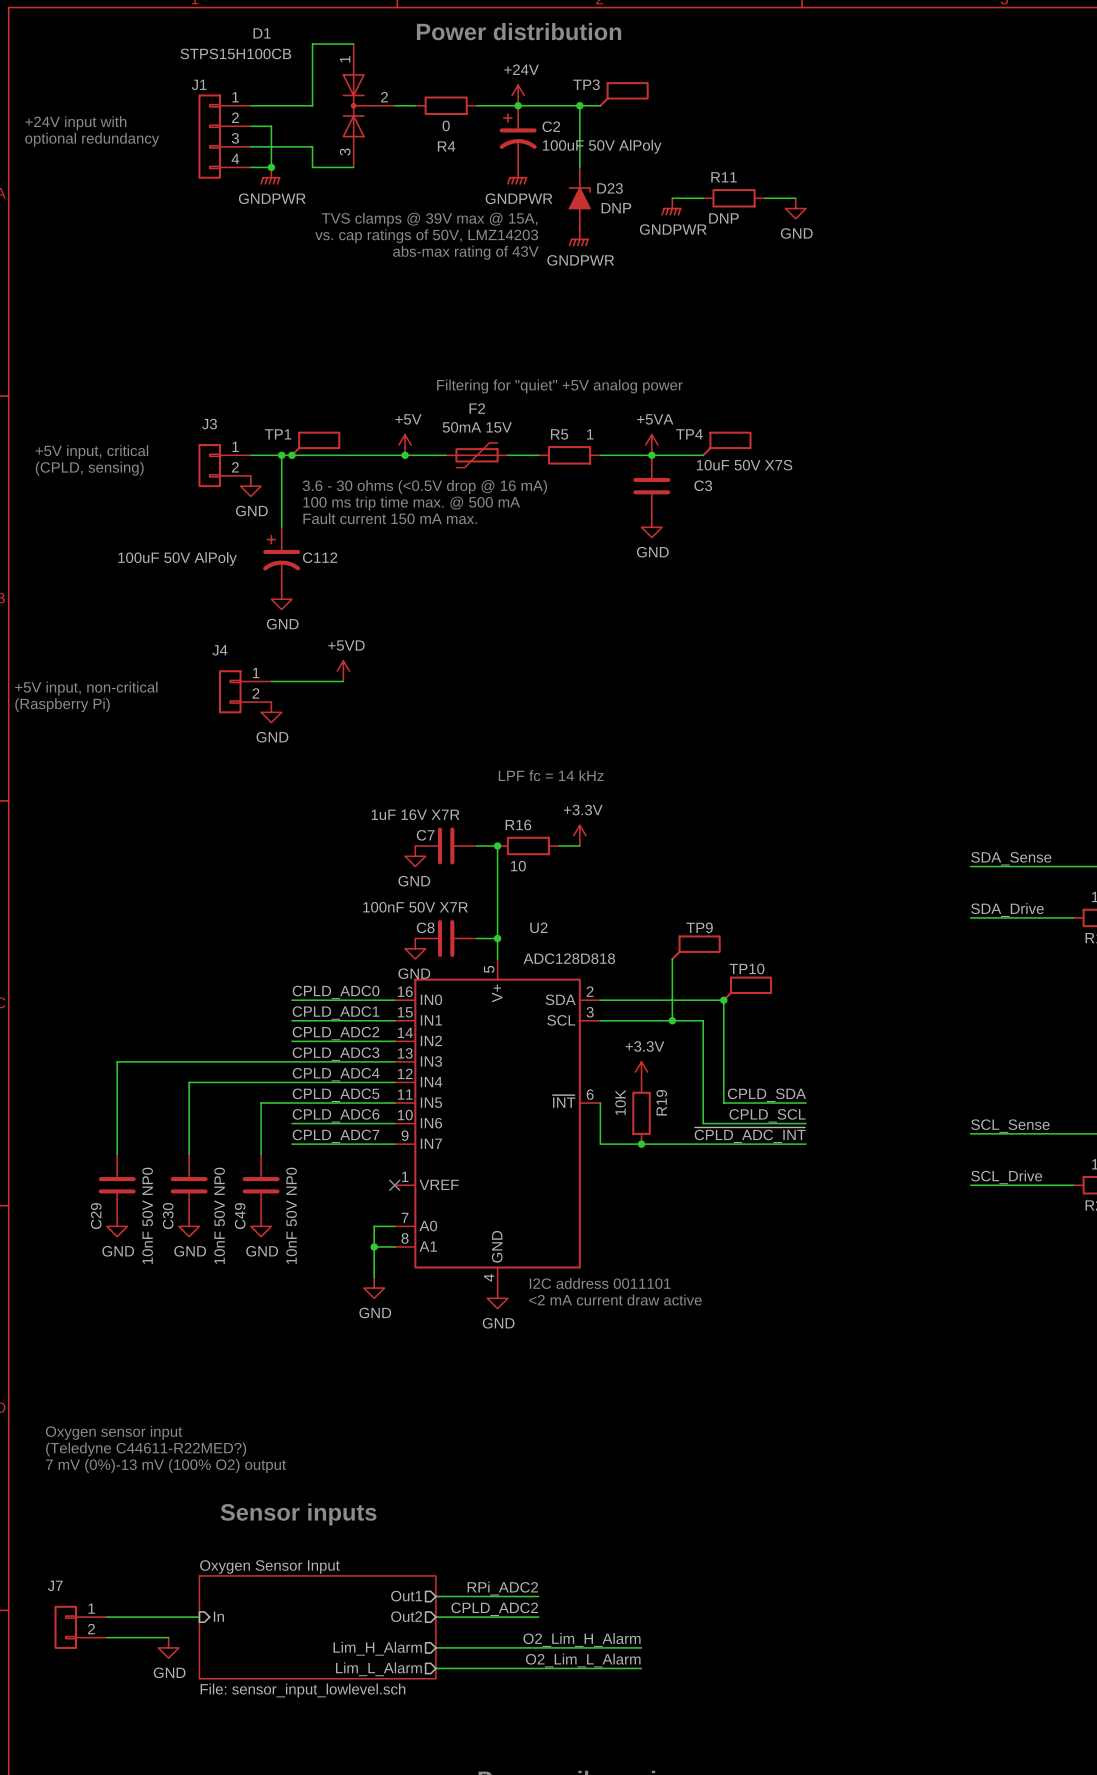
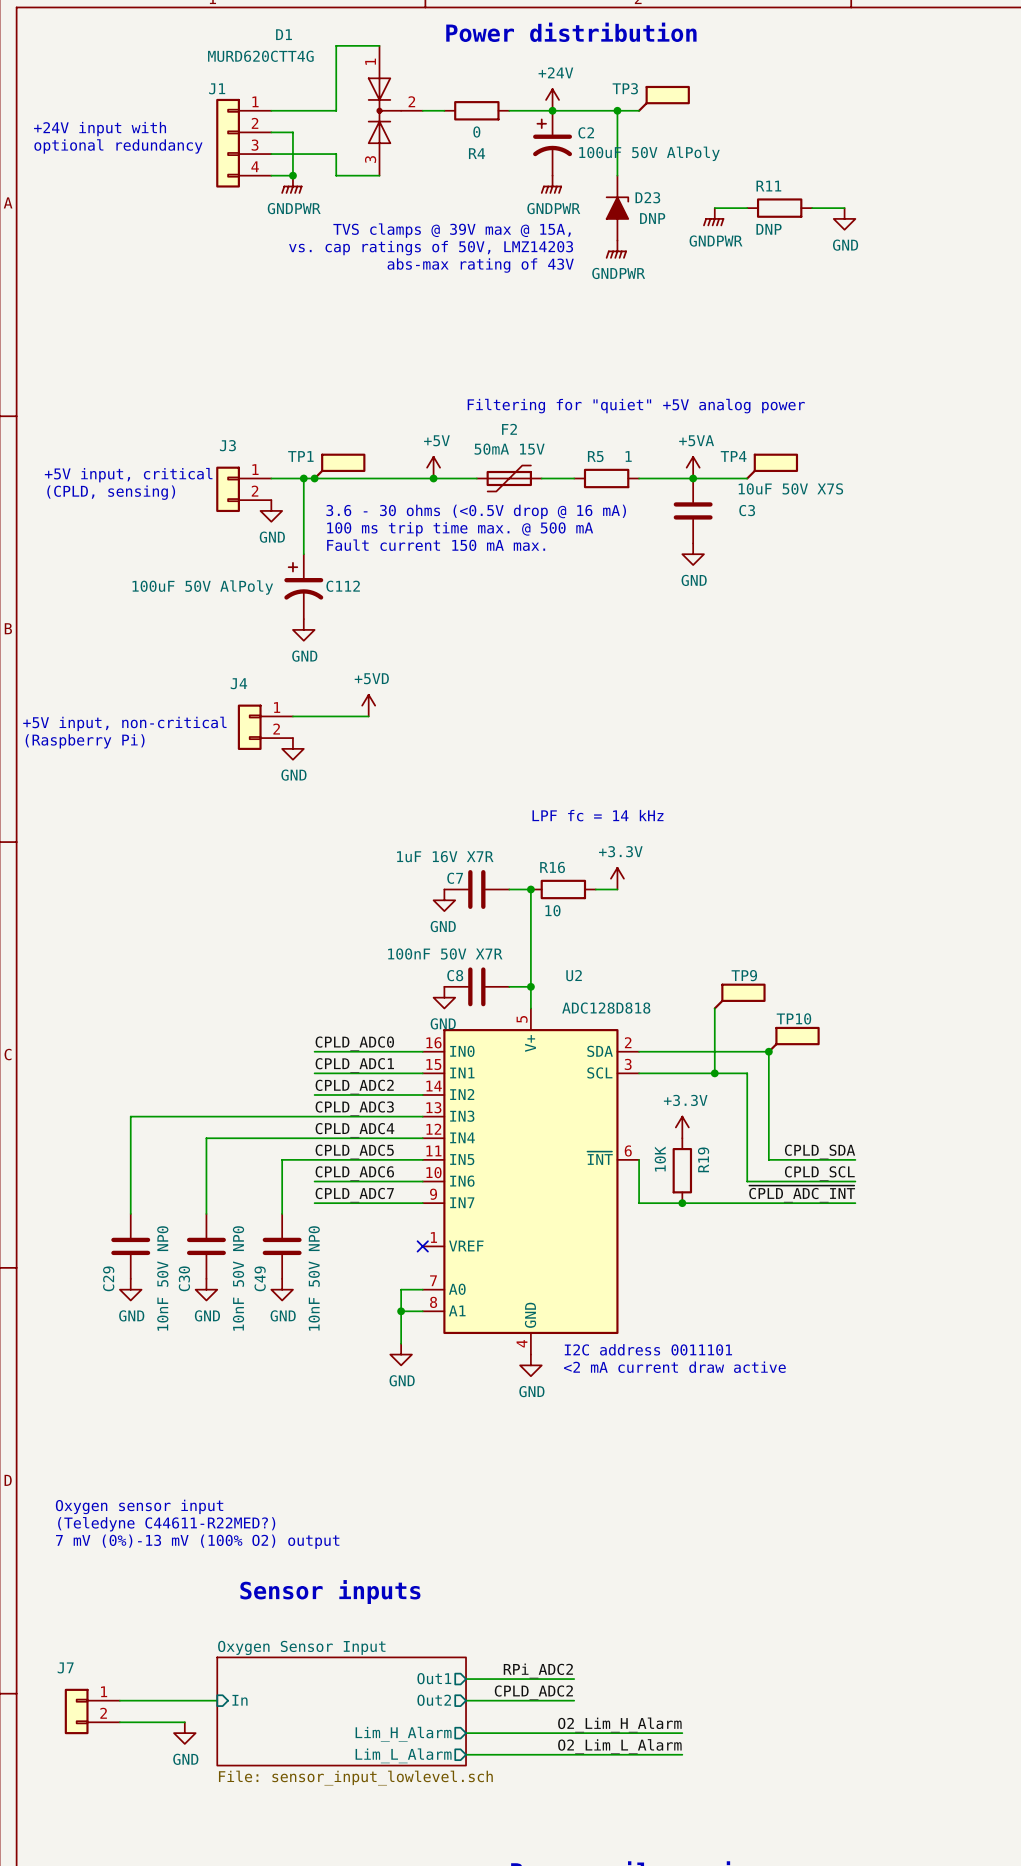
D1 value: STPS15H100CB (235, 53) -> MURD620CTT4G (260, 56)

